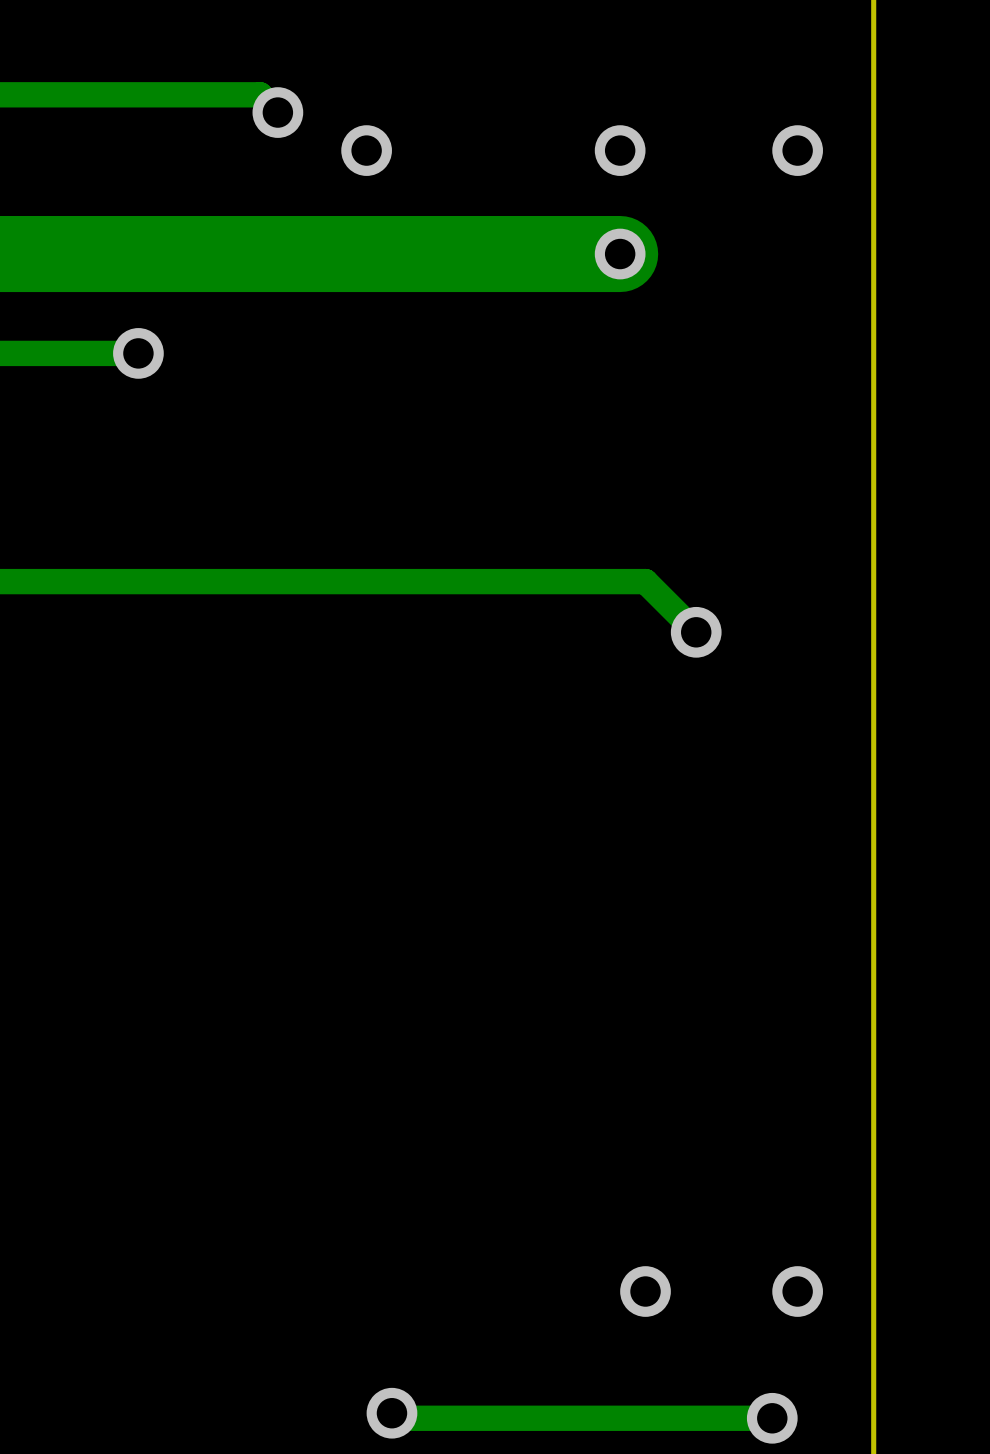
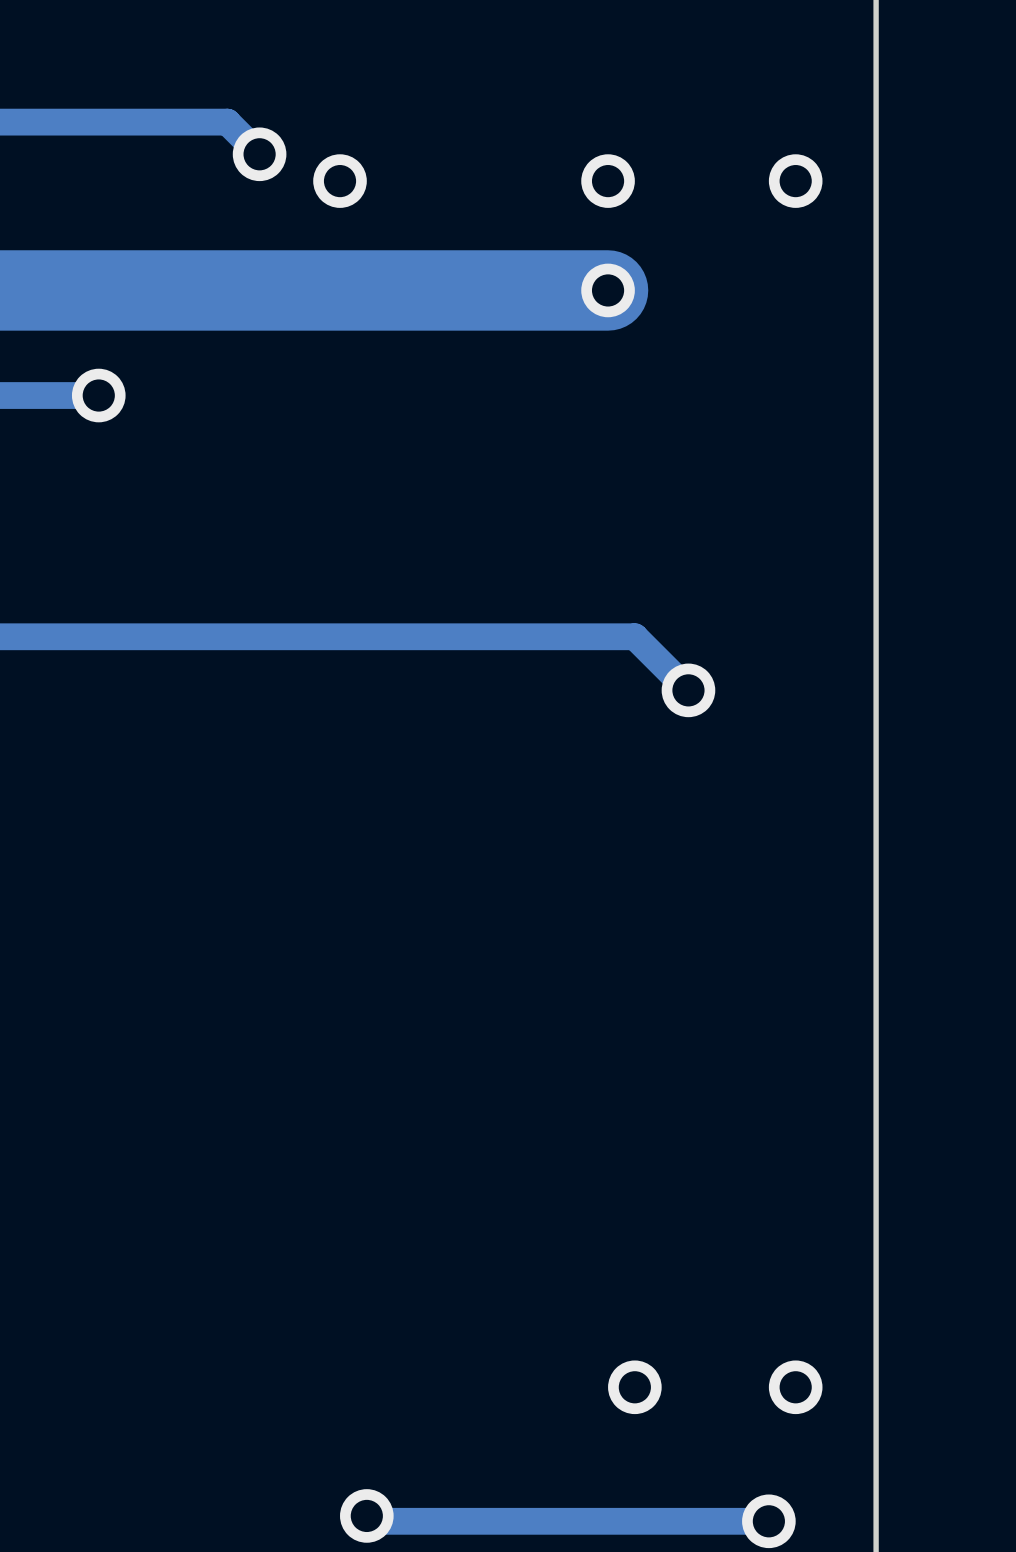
via position: (277, 112) -> (259, 154)

